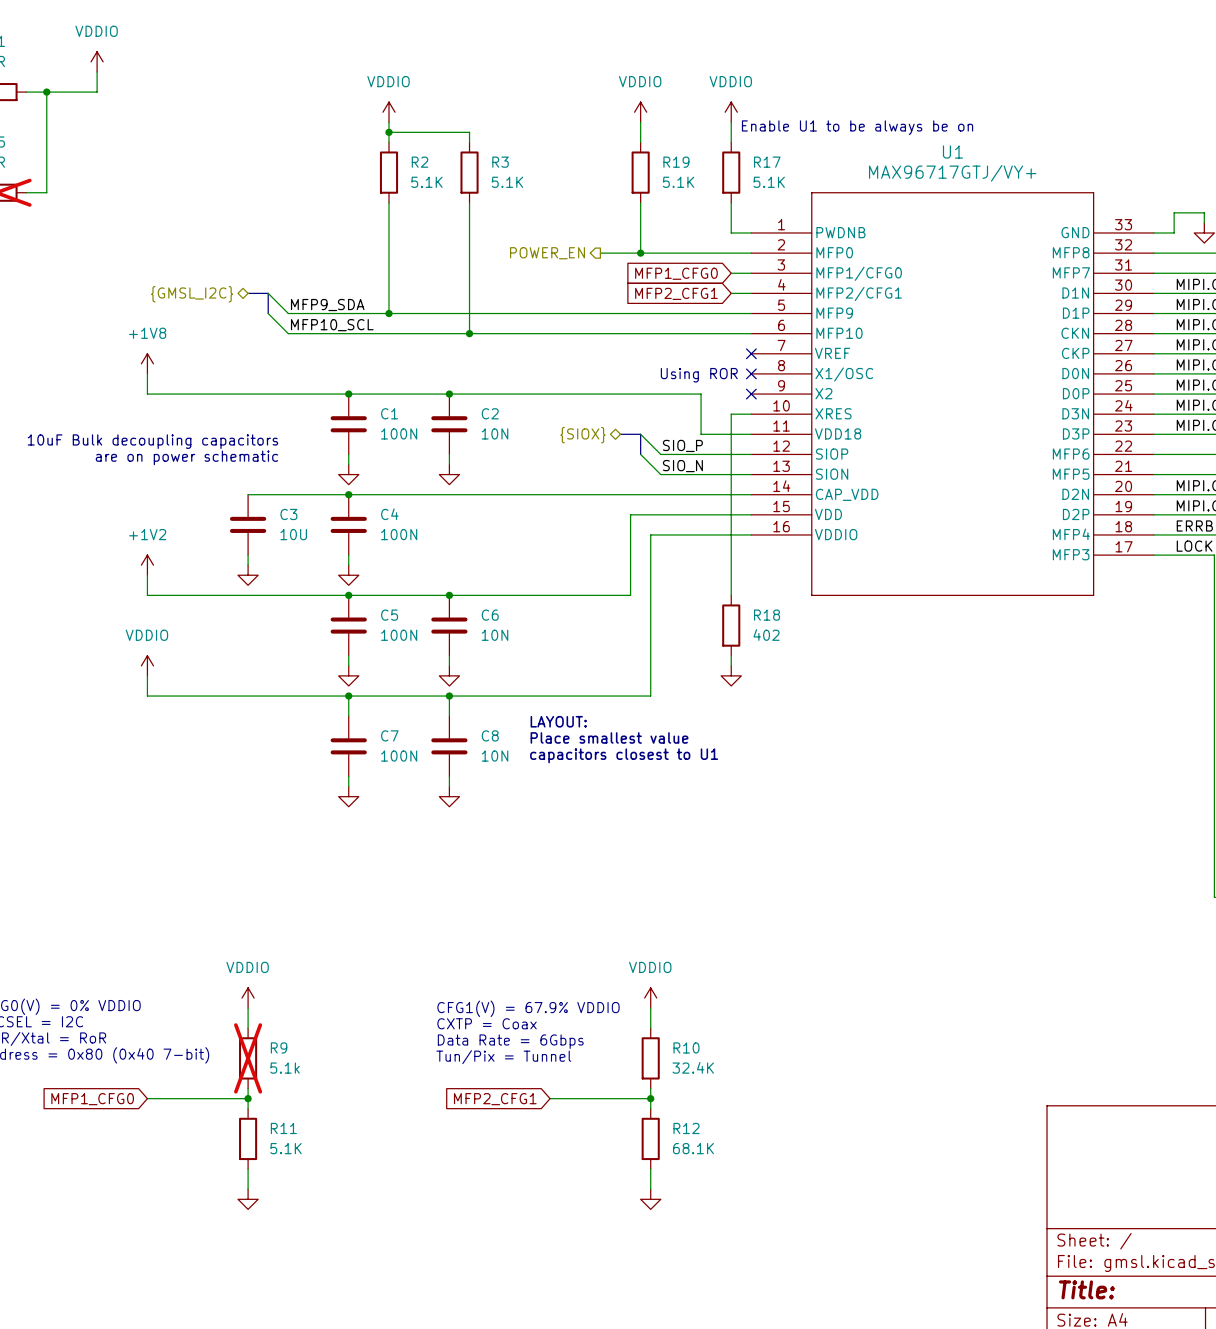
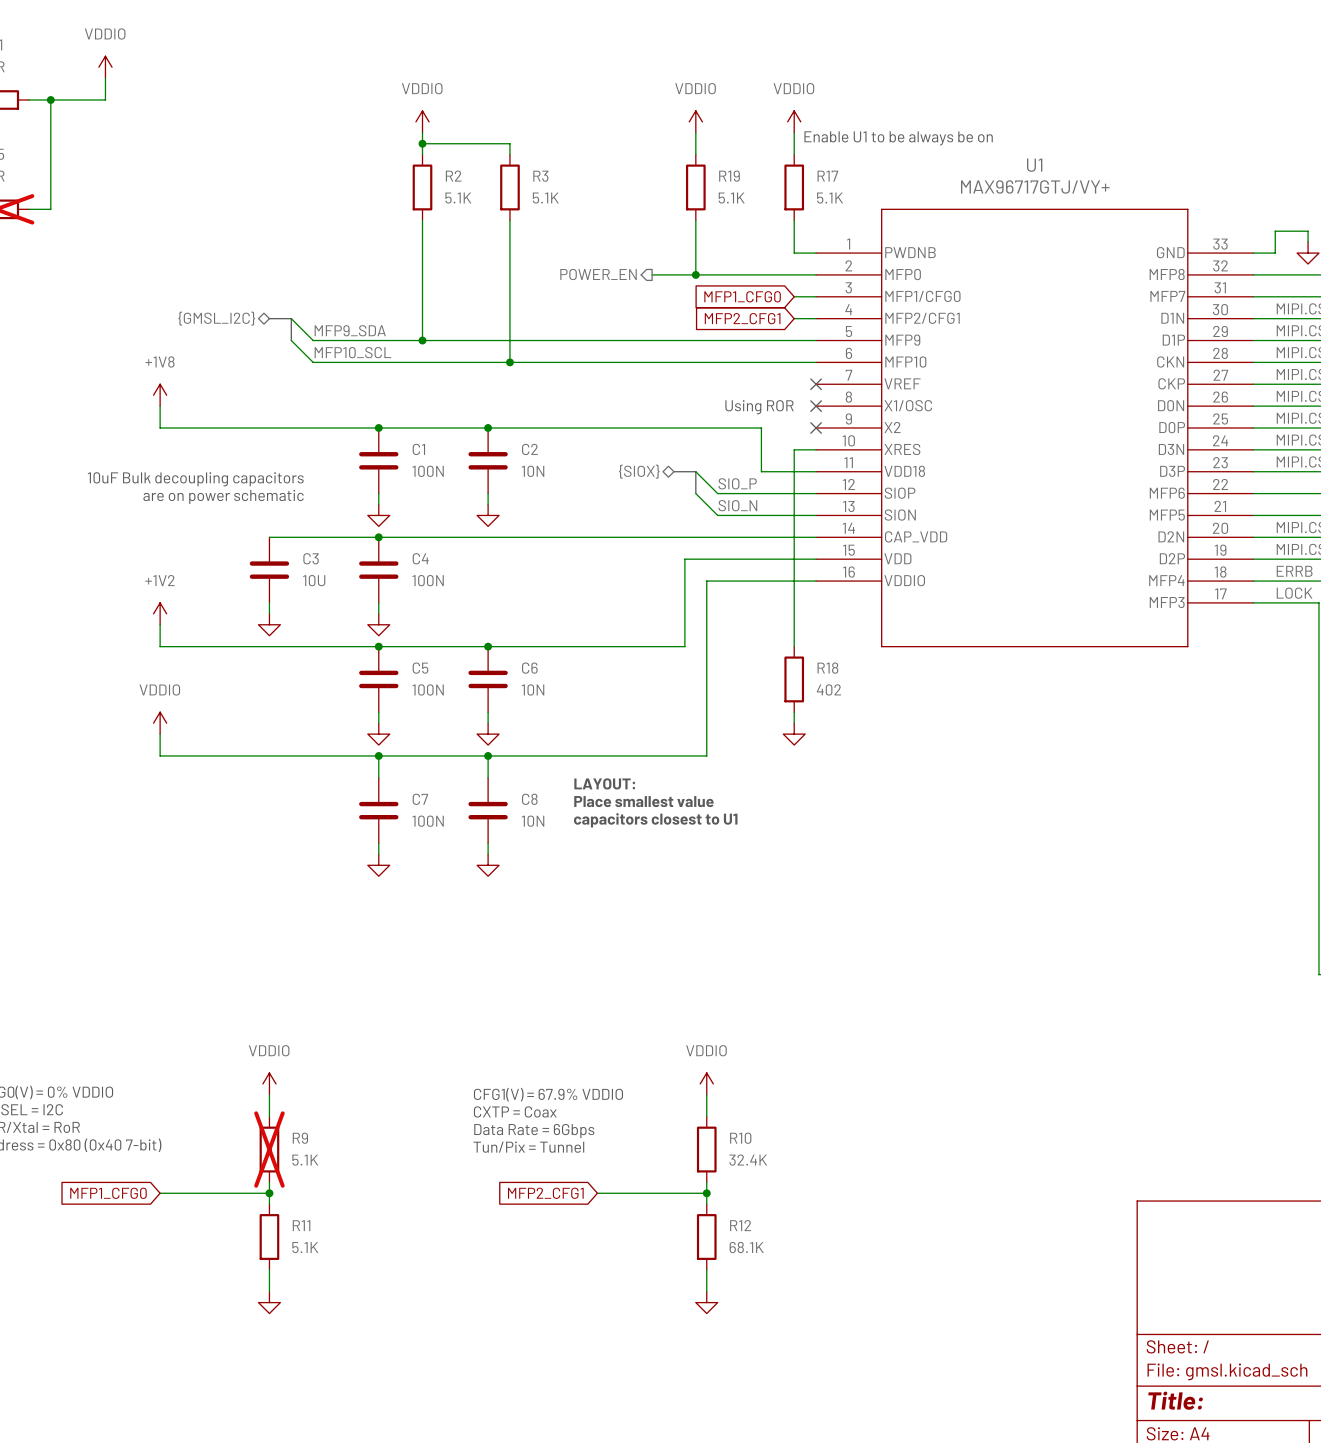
R9 value: 5.1k (285, 1068) -> 5.1K (305, 1160)

